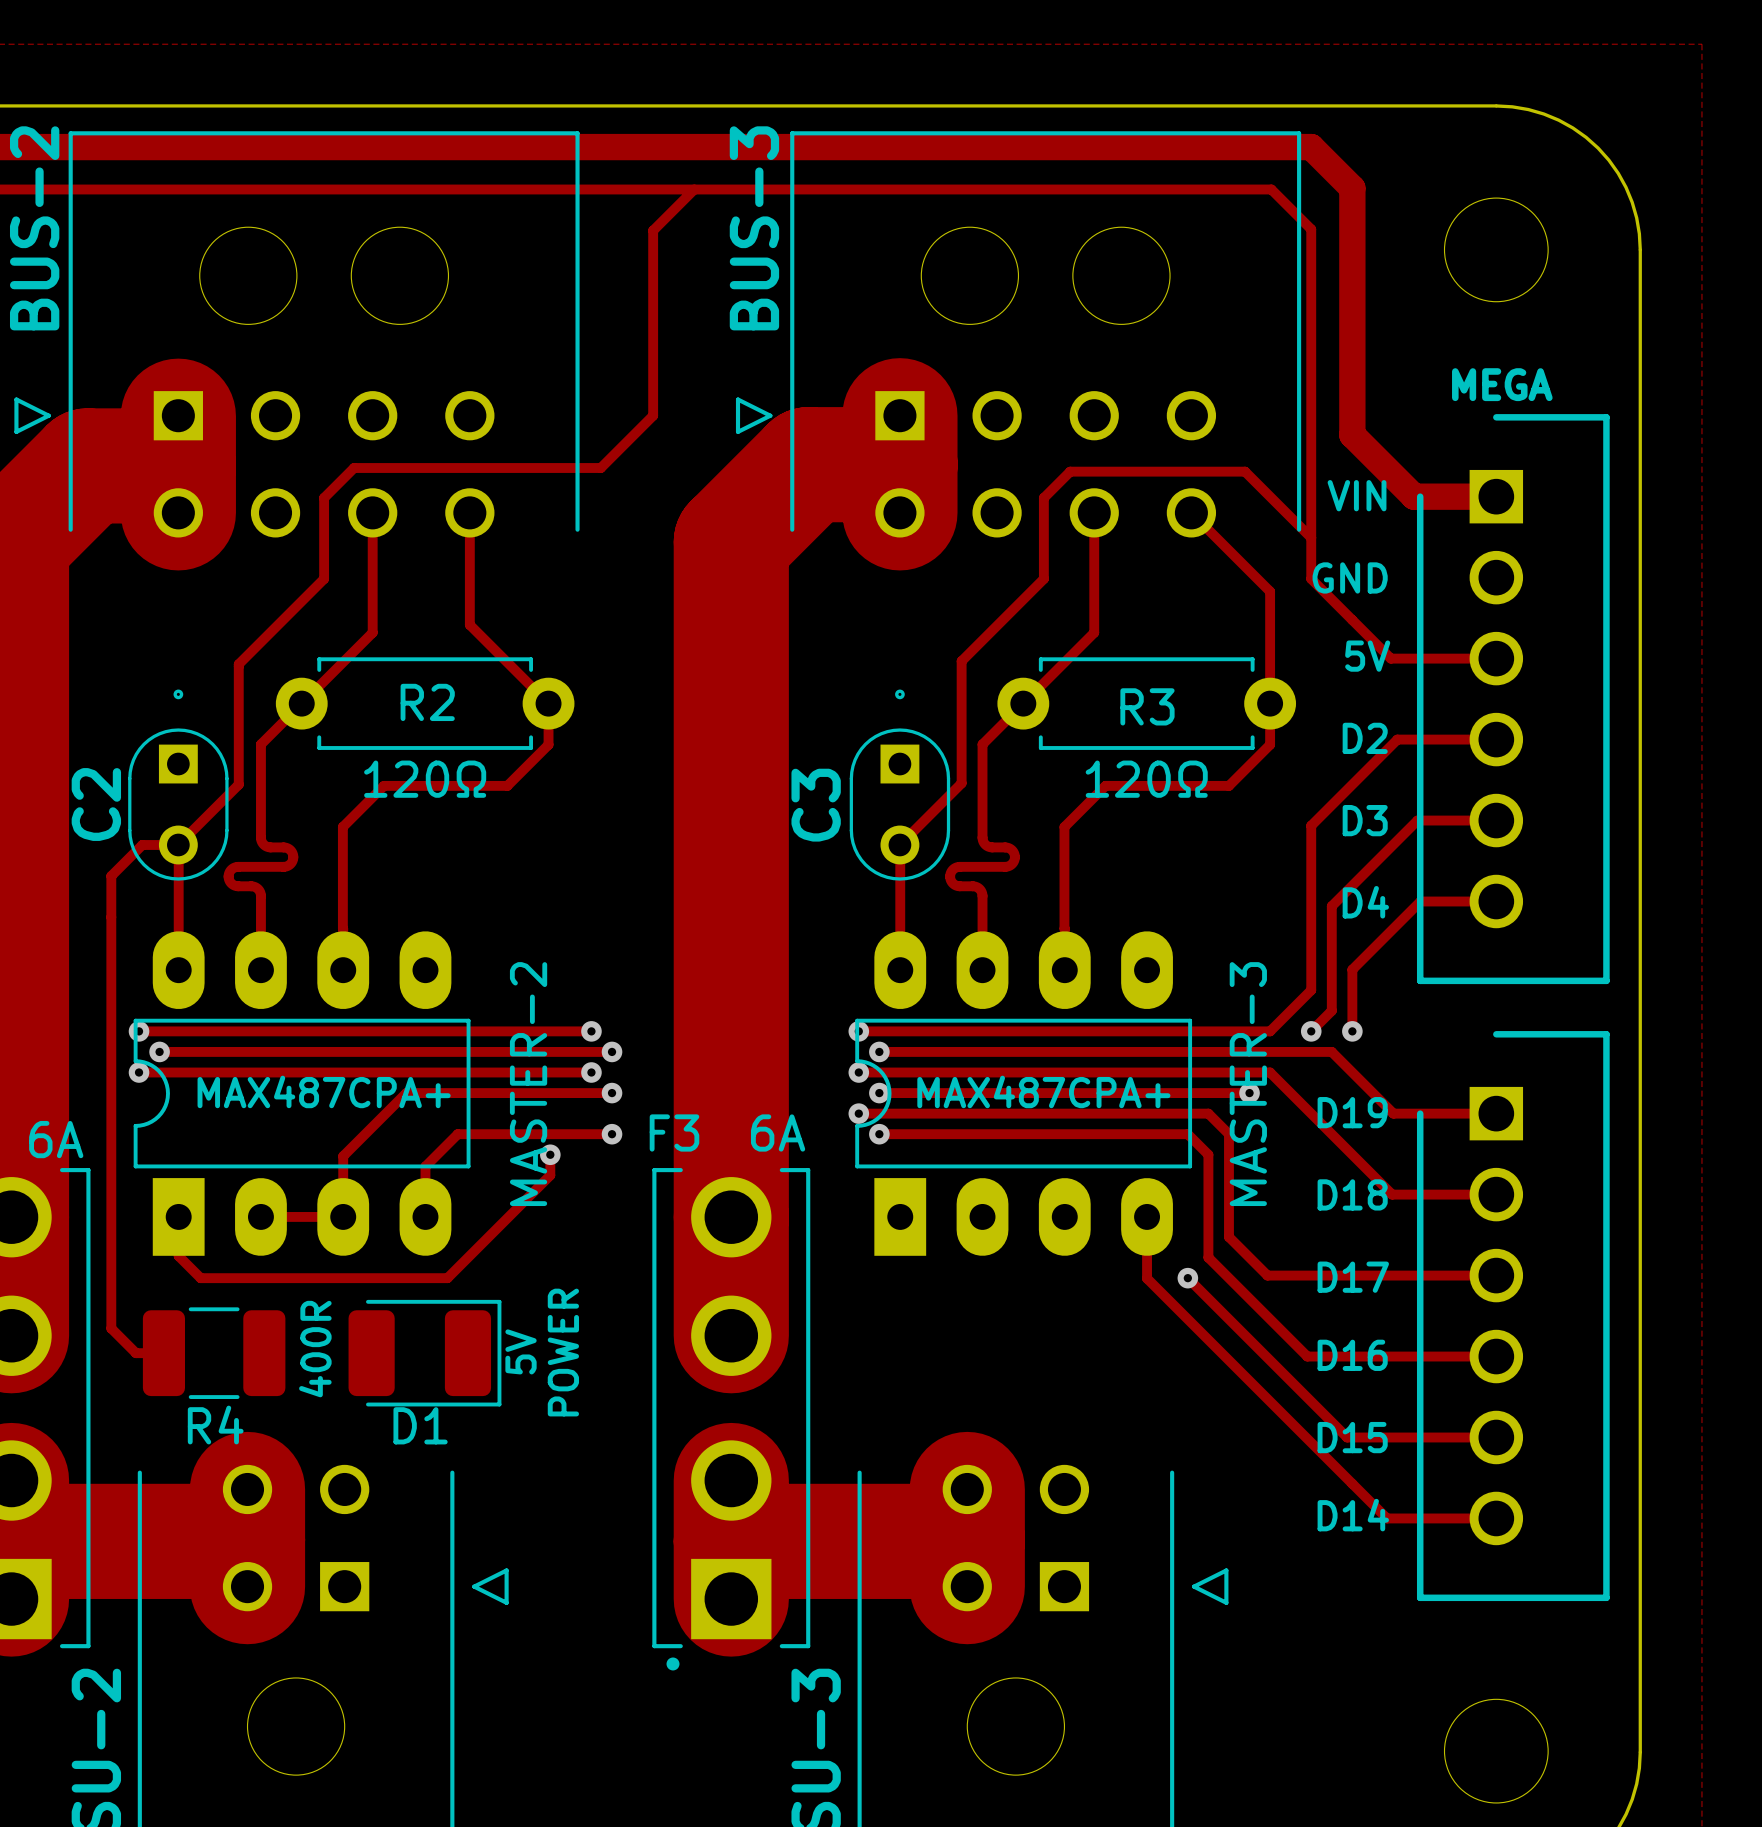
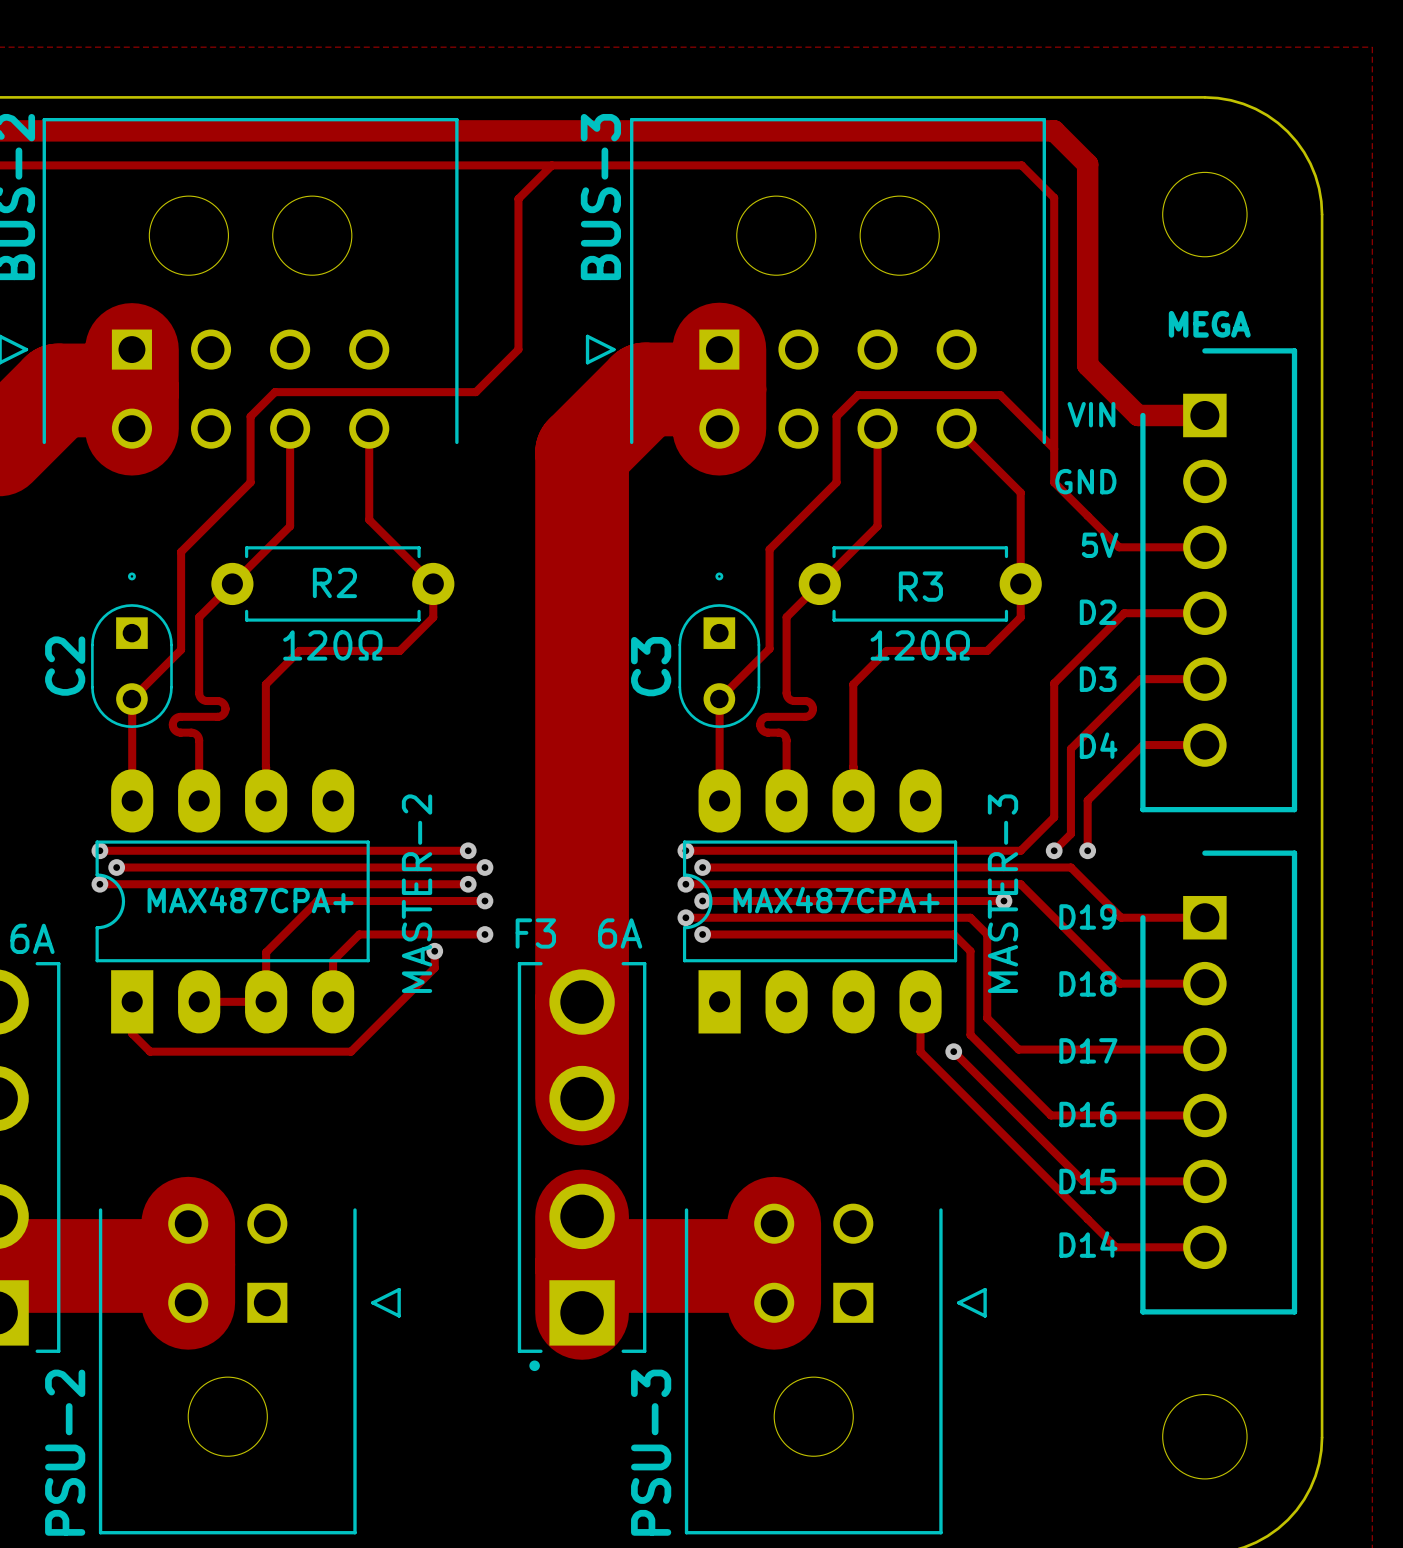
track: (178, 844) (142, 844) (111, 876) (111, 1328) (135, 1353) (163, 1353) -> none
text: 5V (521, 1351) -> none
text: POWER (563, 1352) -> none
R4: 400R (214, 1353) -> none
D1: (424, 1353) -> none

